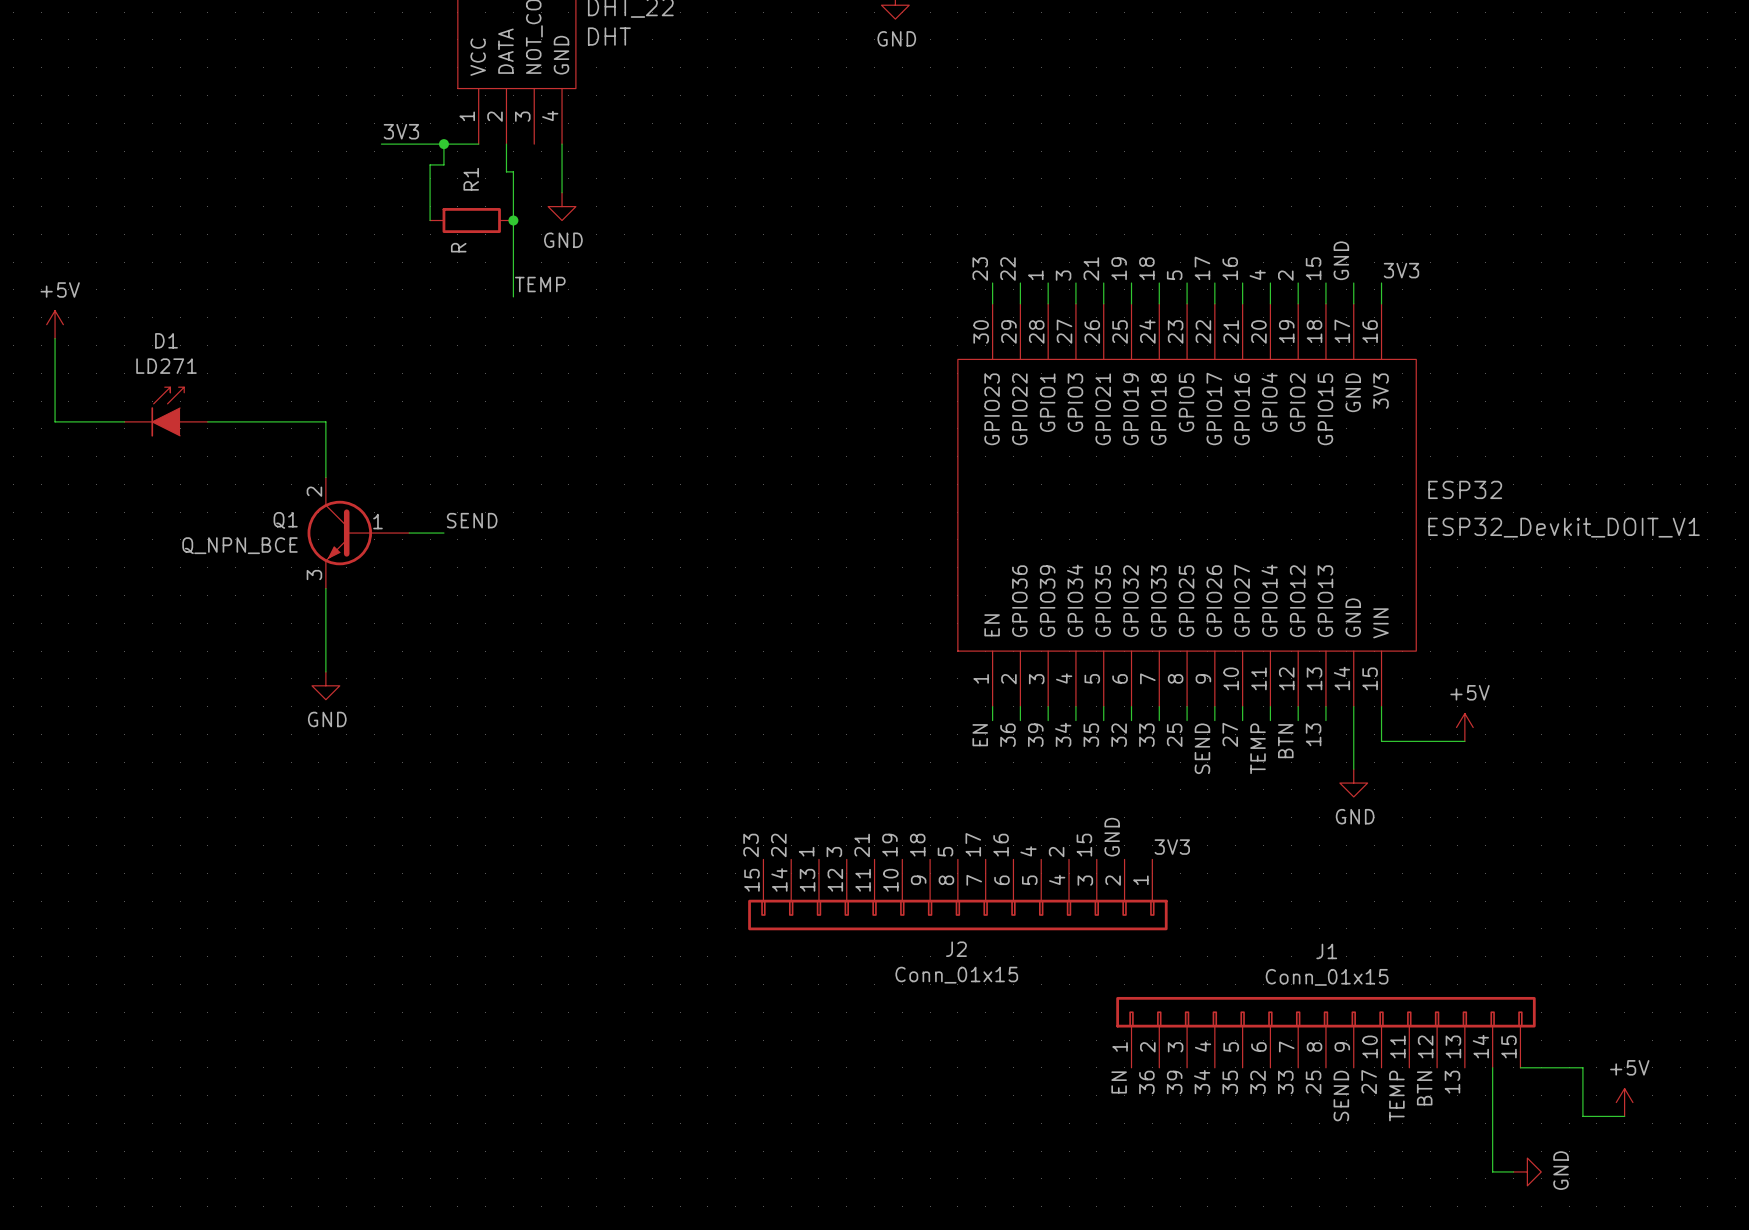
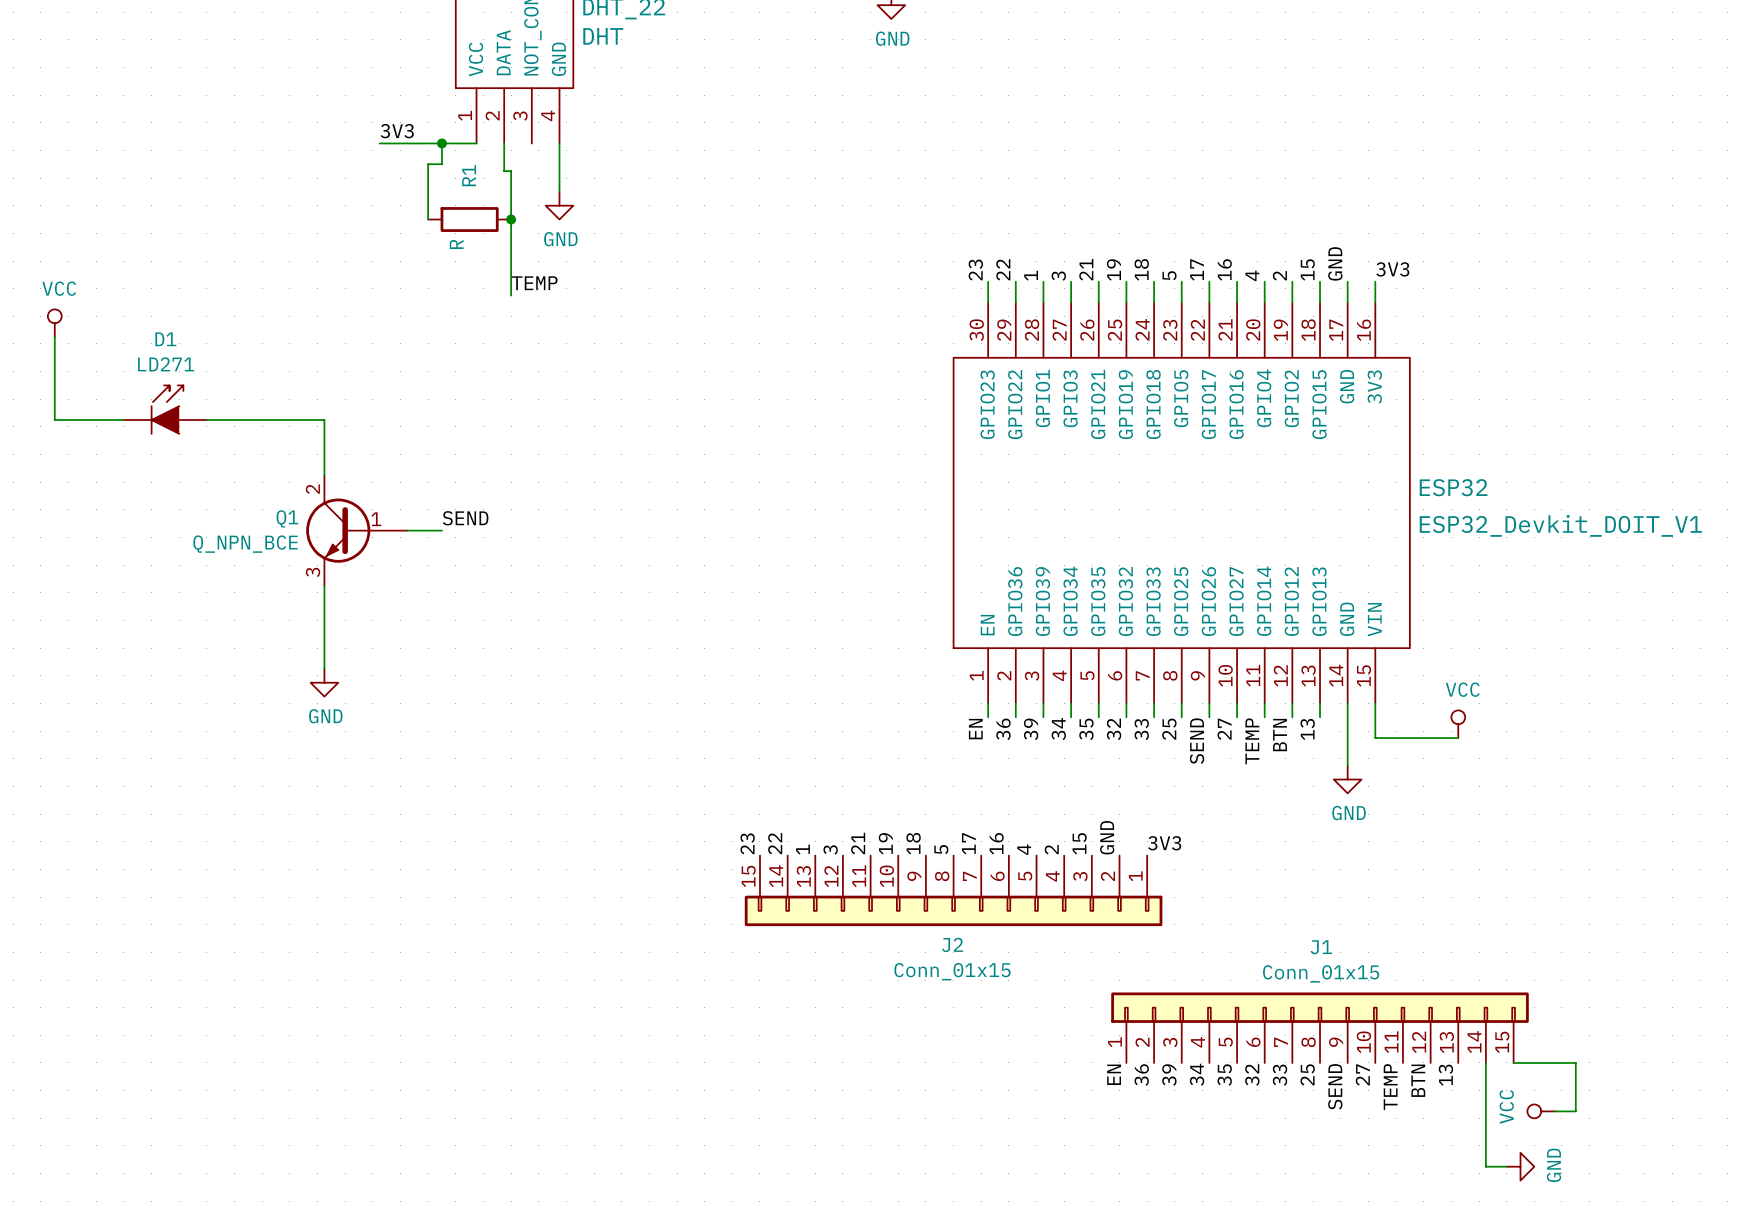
power symbol: +5V (55, 324) -> VCC (54, 323)
power symbol: +5V (1464, 727) -> VCC (1458, 724)
power symbol: +5V (1624, 1102) -> none
power symbol: none -> VCC (1541, 1111)
wire: (1582, 1116) (1624, 1116) -> (1575, 1111) (1555, 1111)

